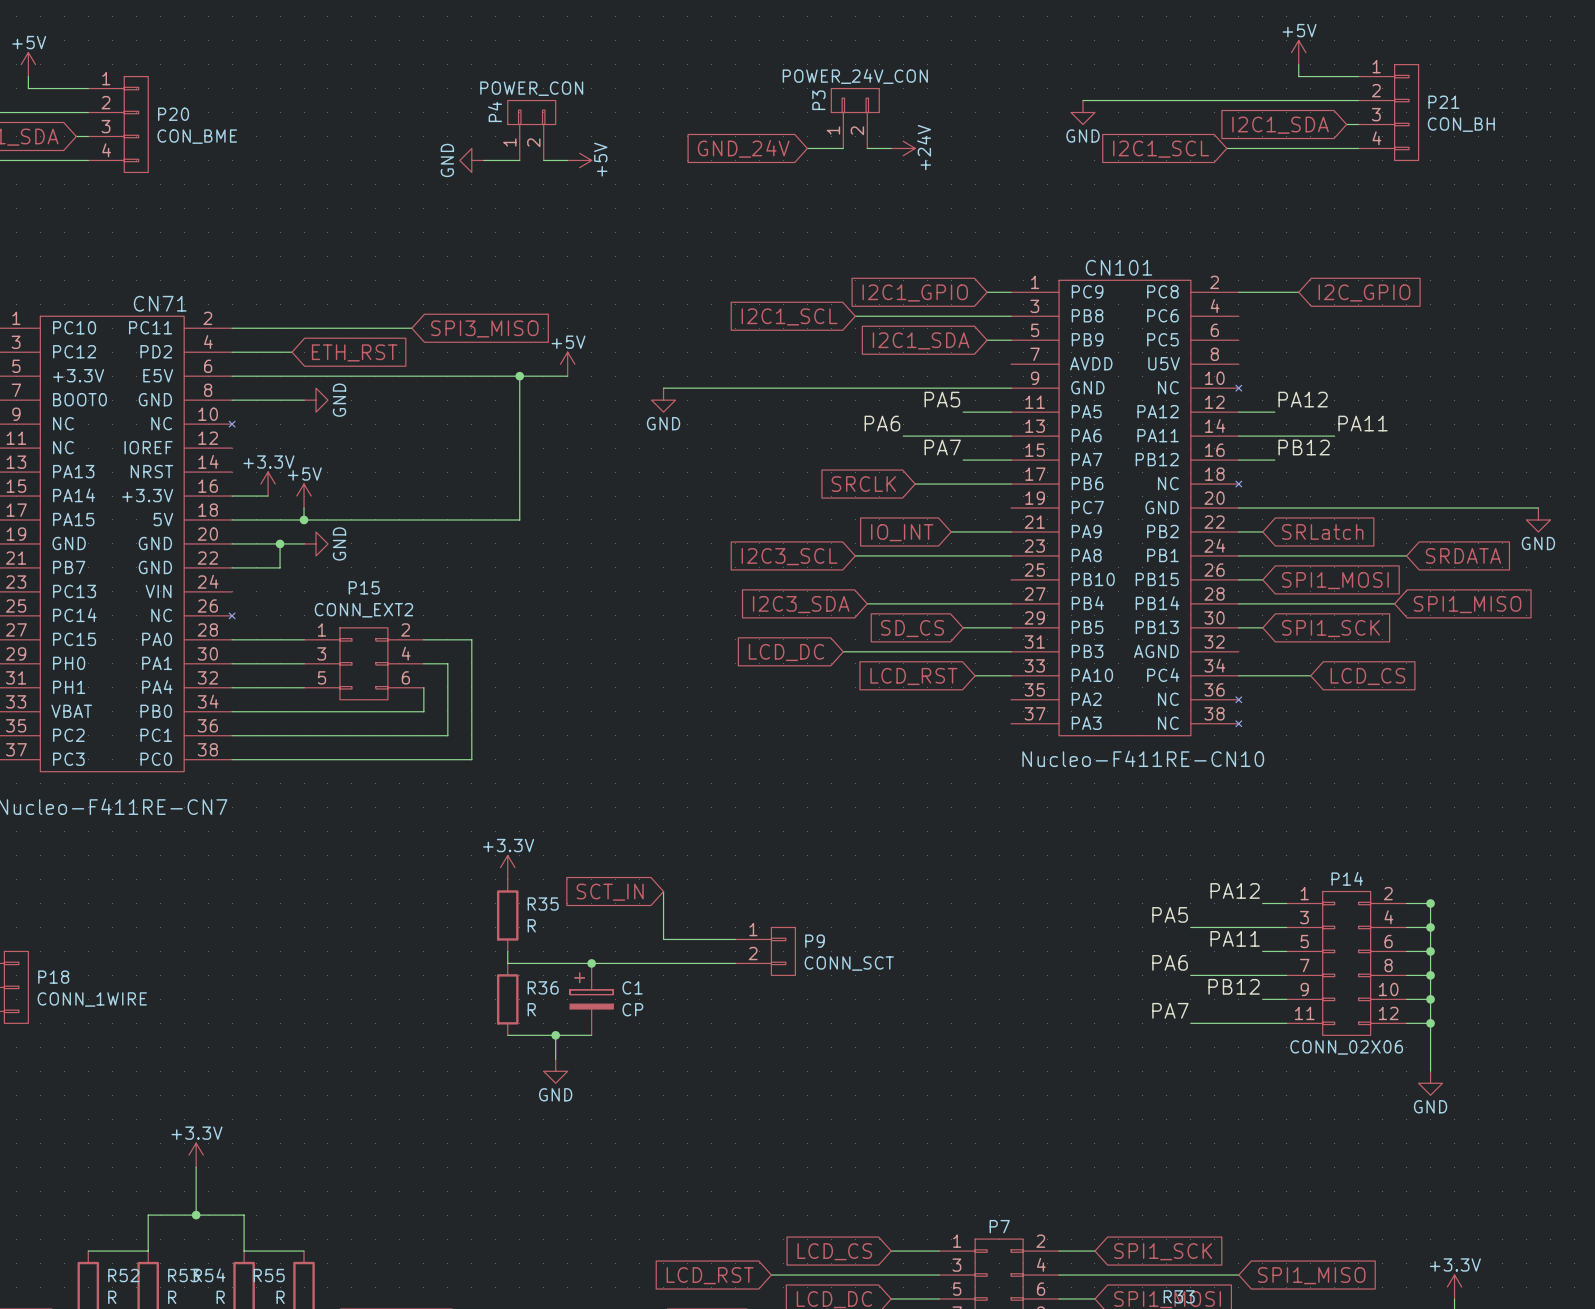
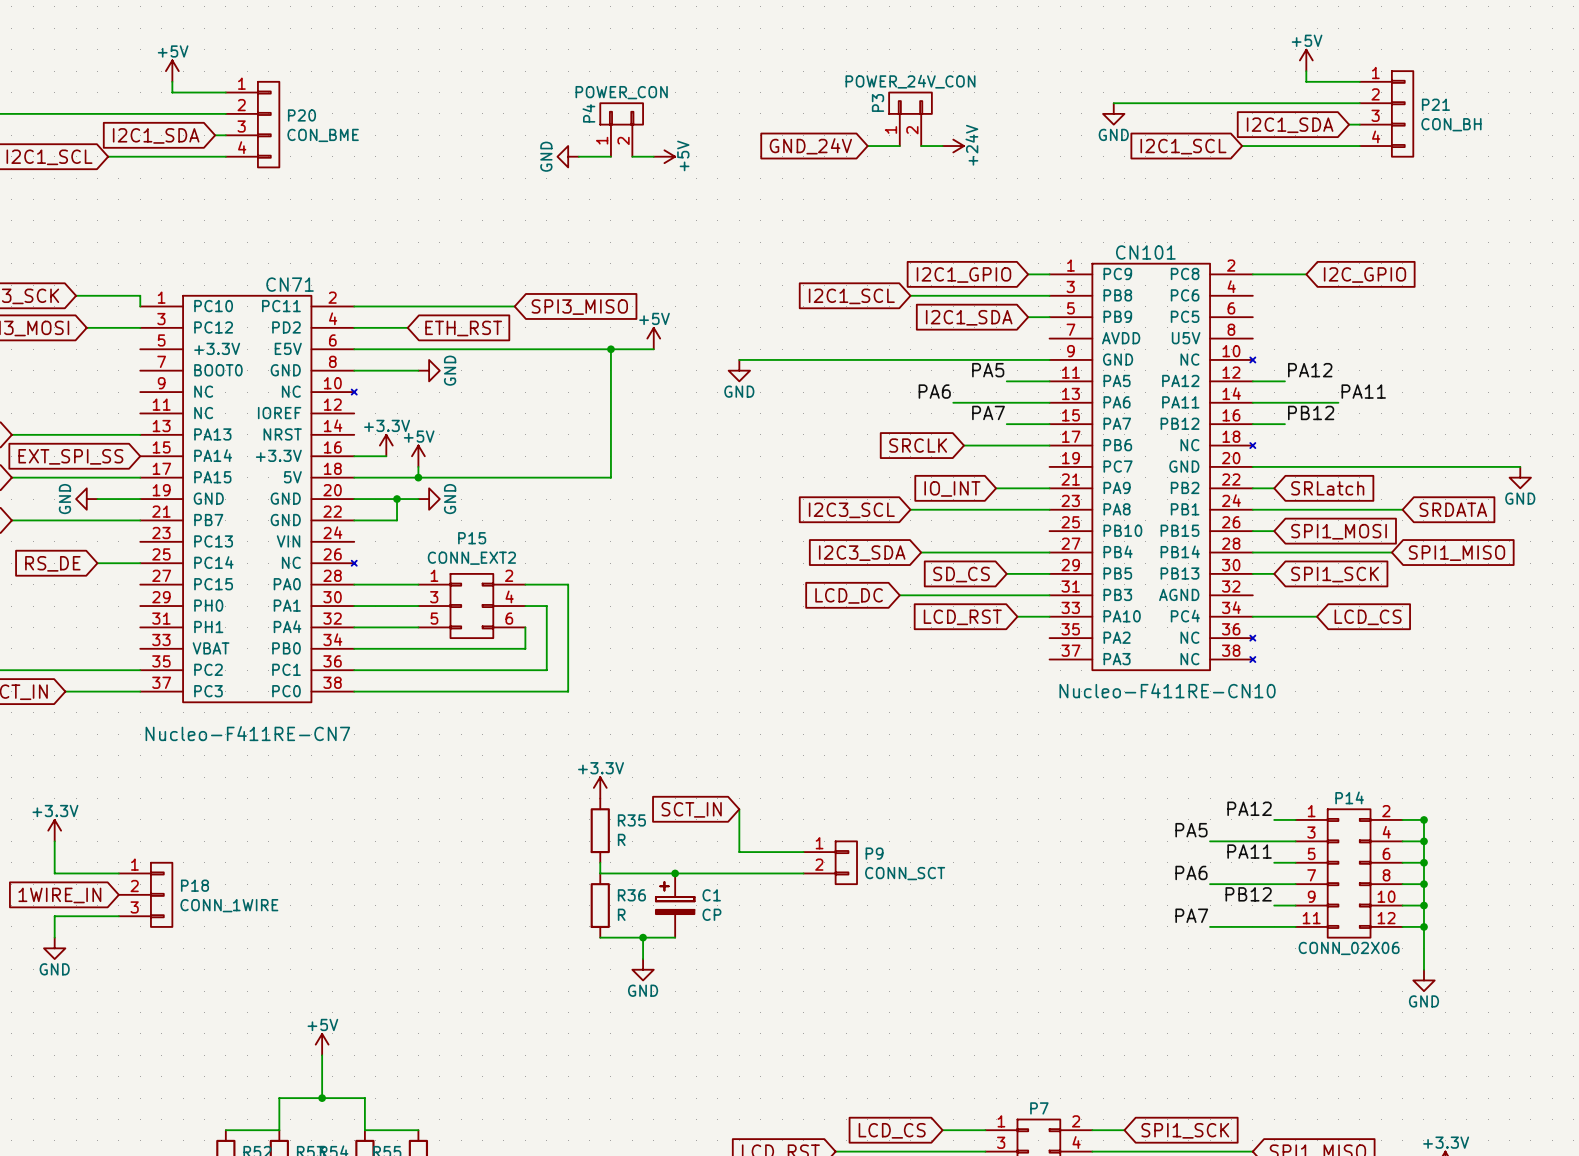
power symbol: +3.3V (196, 1155) -> +5V (322, 1044)

